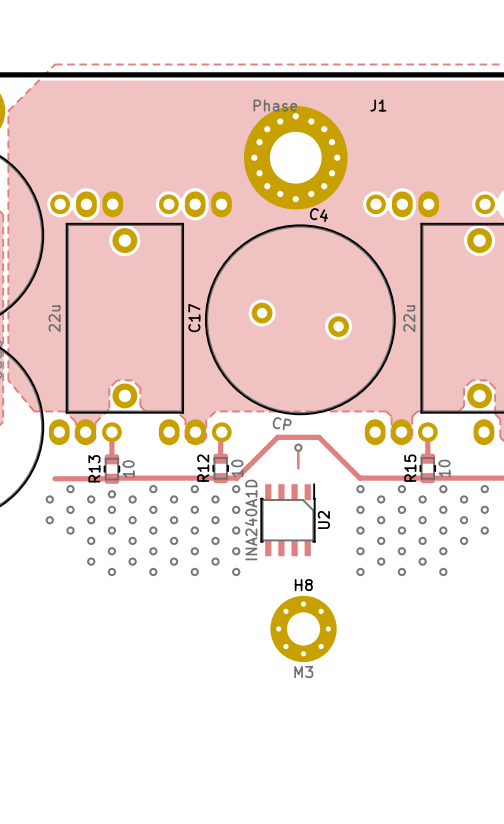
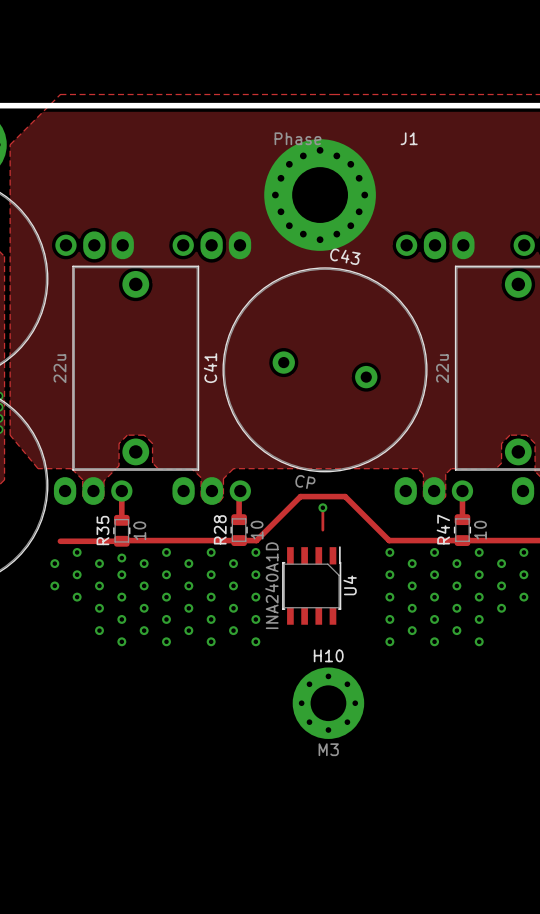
C4 name: C4 (318, 215) -> C43 (345, 256)
C17 name: C17 (194, 317) -> C41 (210, 368)
R13 name: R13 (94, 468) -> R35 (102, 530)
R12 name: R12 (203, 468) -> R28 (220, 529)
R15 name: R15 (410, 468) -> R47 (443, 529)
U2 name: U2 (323, 519) -> U4 (350, 585)
H8 name: H8 (303, 585) -> H10 (328, 655)

